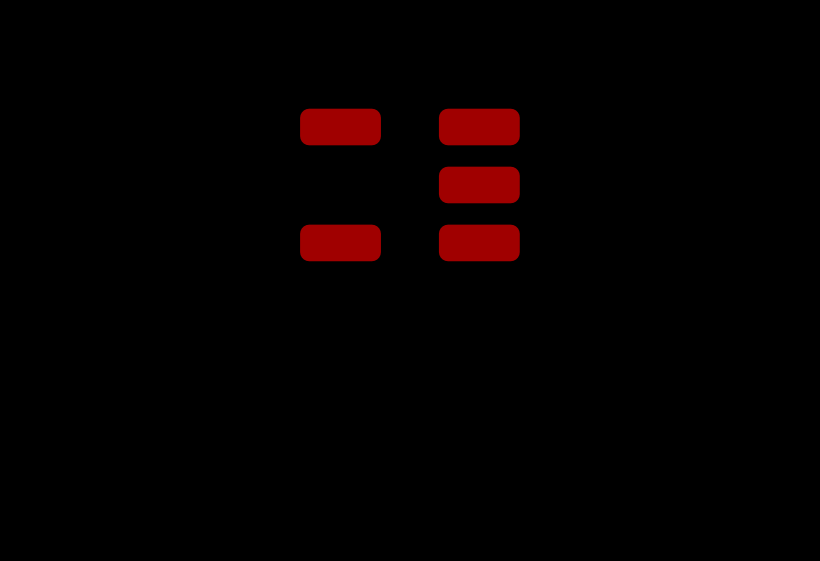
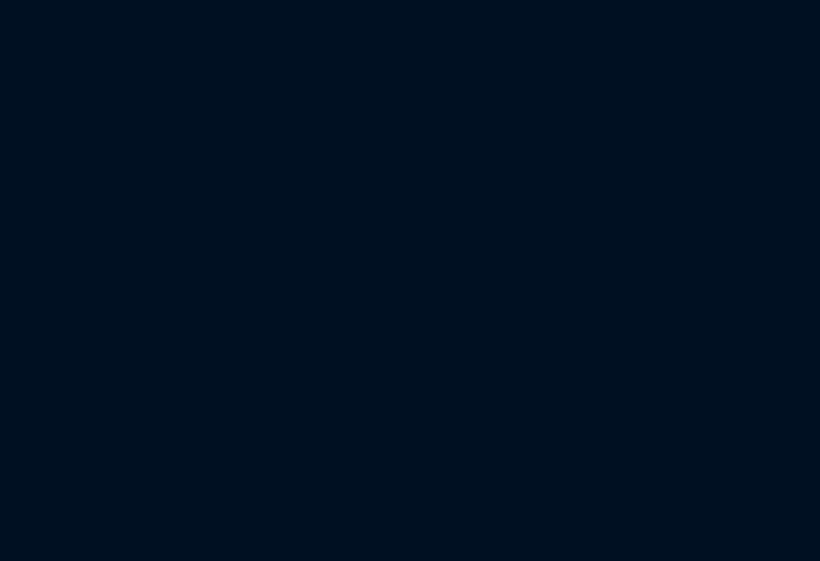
part: (409, 184) -> none

